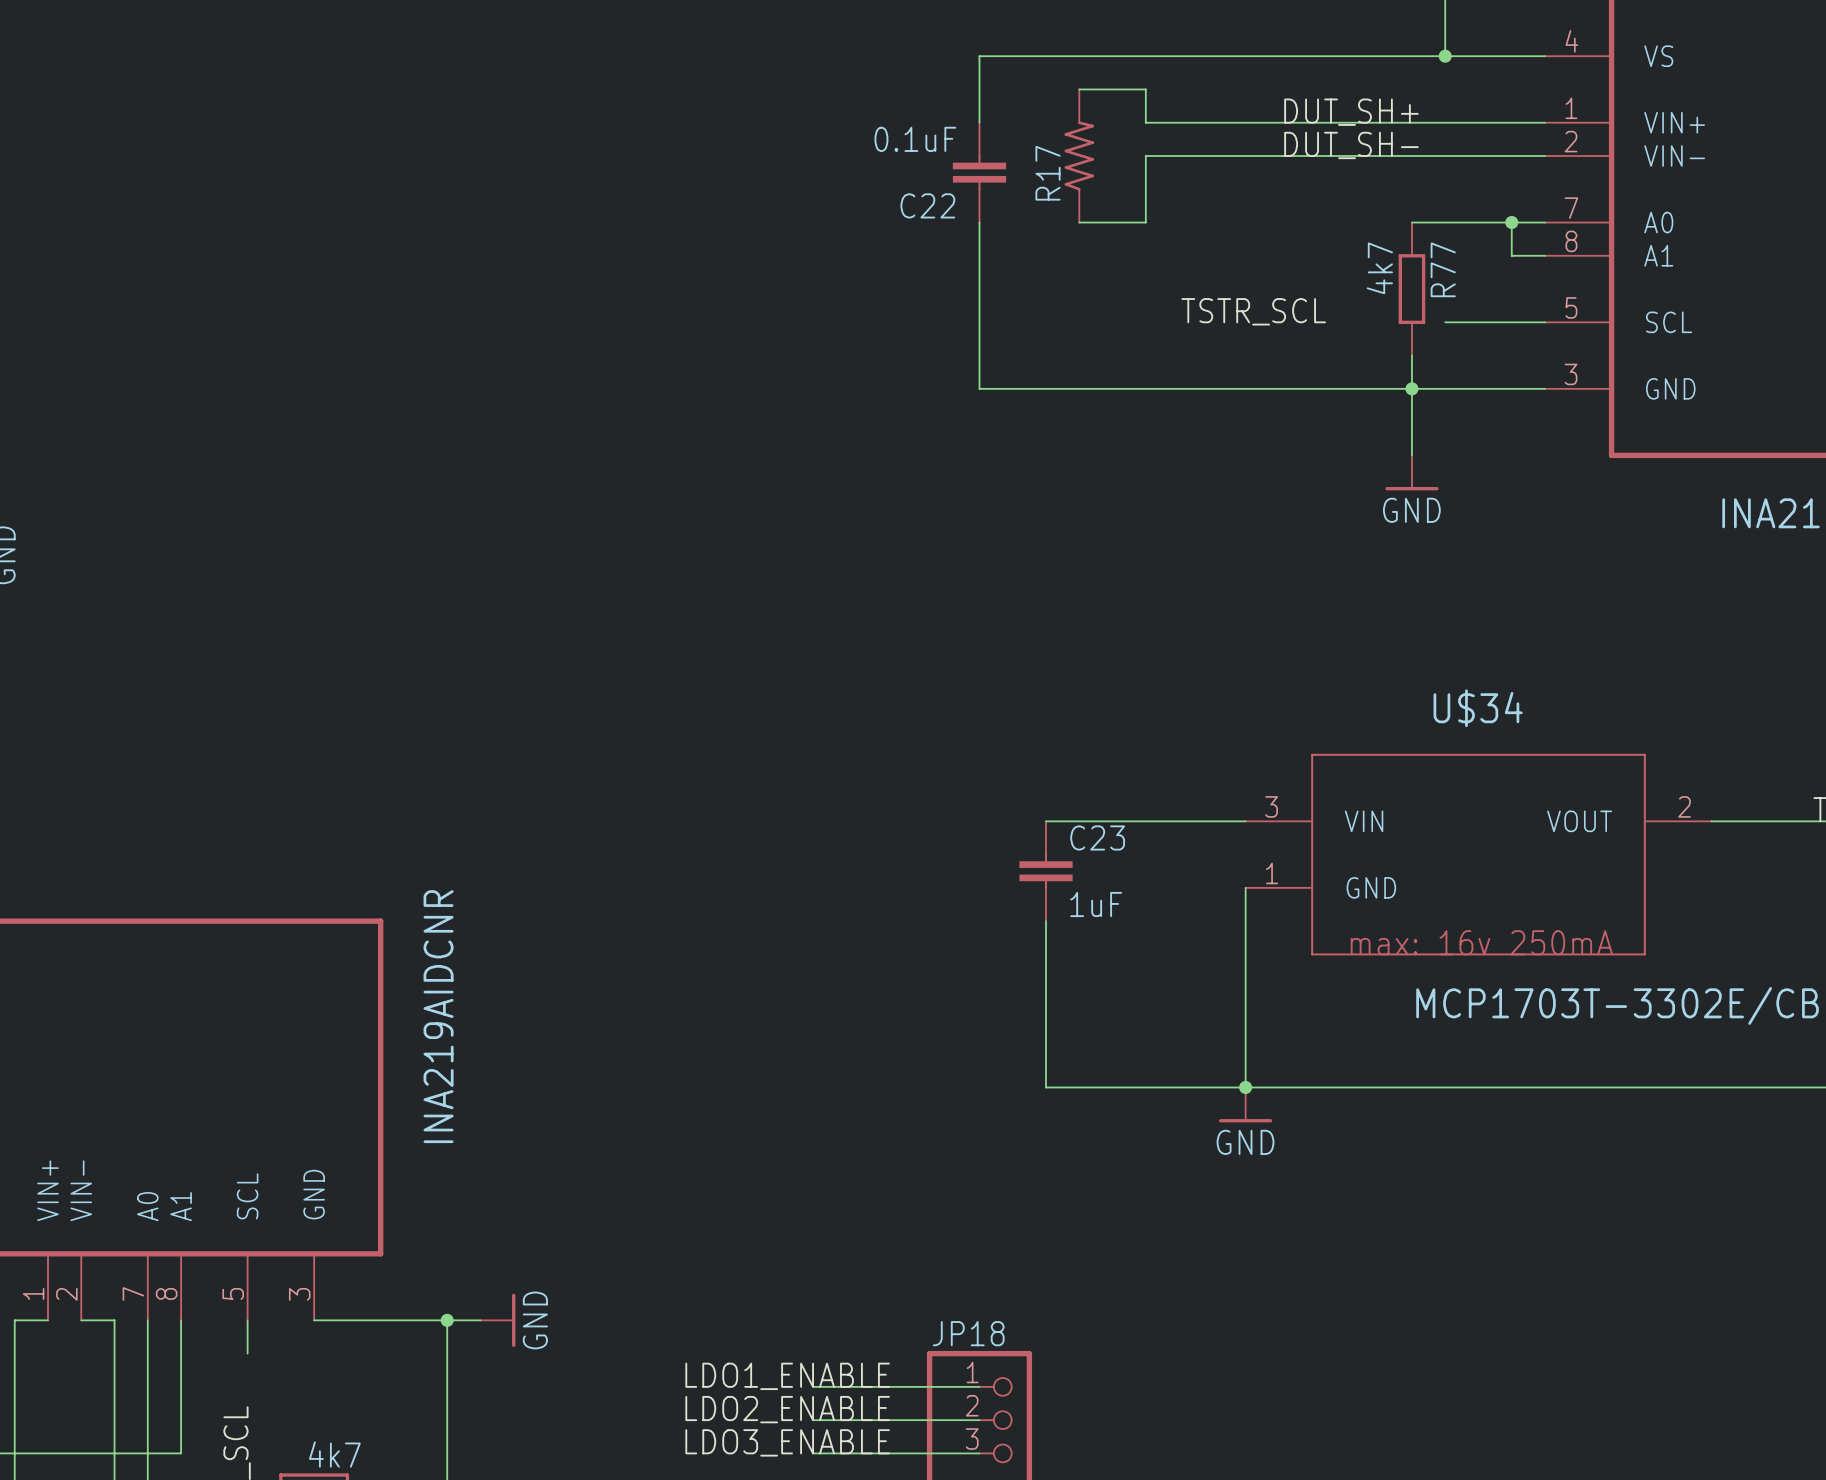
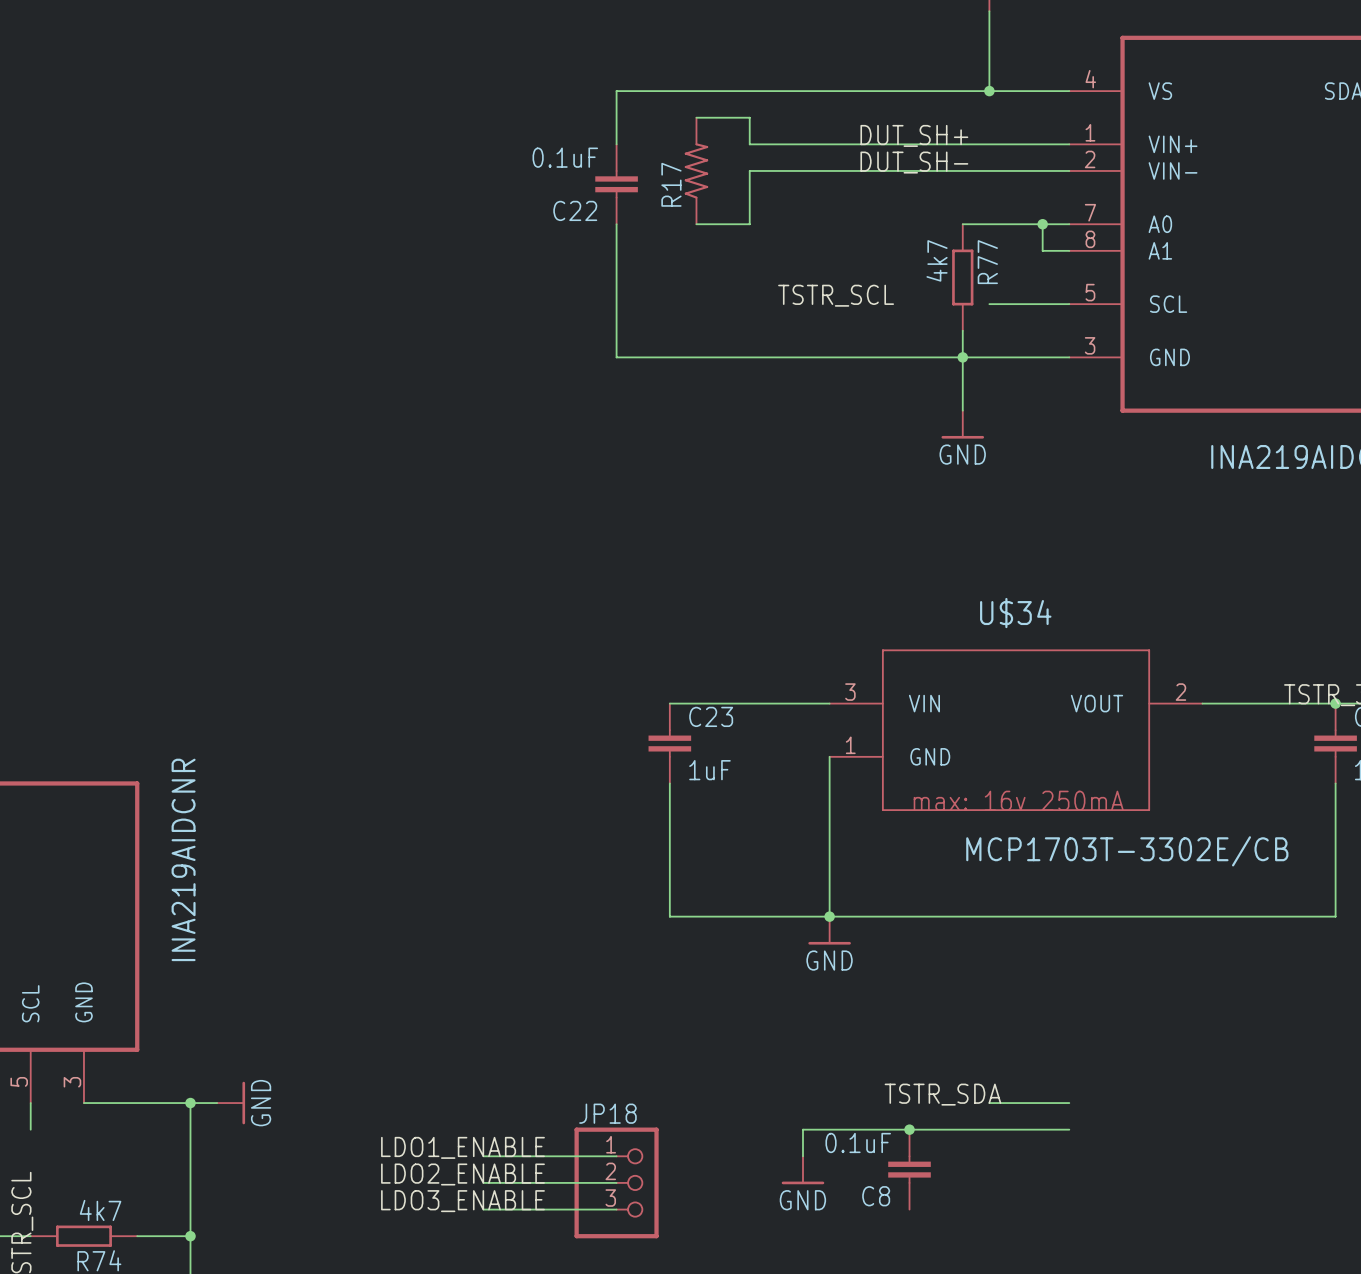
label: none -> TSTR_SDA (942, 1094)
wire: none -> (989, 1103) (1069, 1103)
junction: none -> (909, 1129)
wire: none -> (1069, 1129) (802, 1129) (802, 1156)
C8: none -> 0.1uF (909, 1169)
power symbol: none -> GND (802, 1170)

